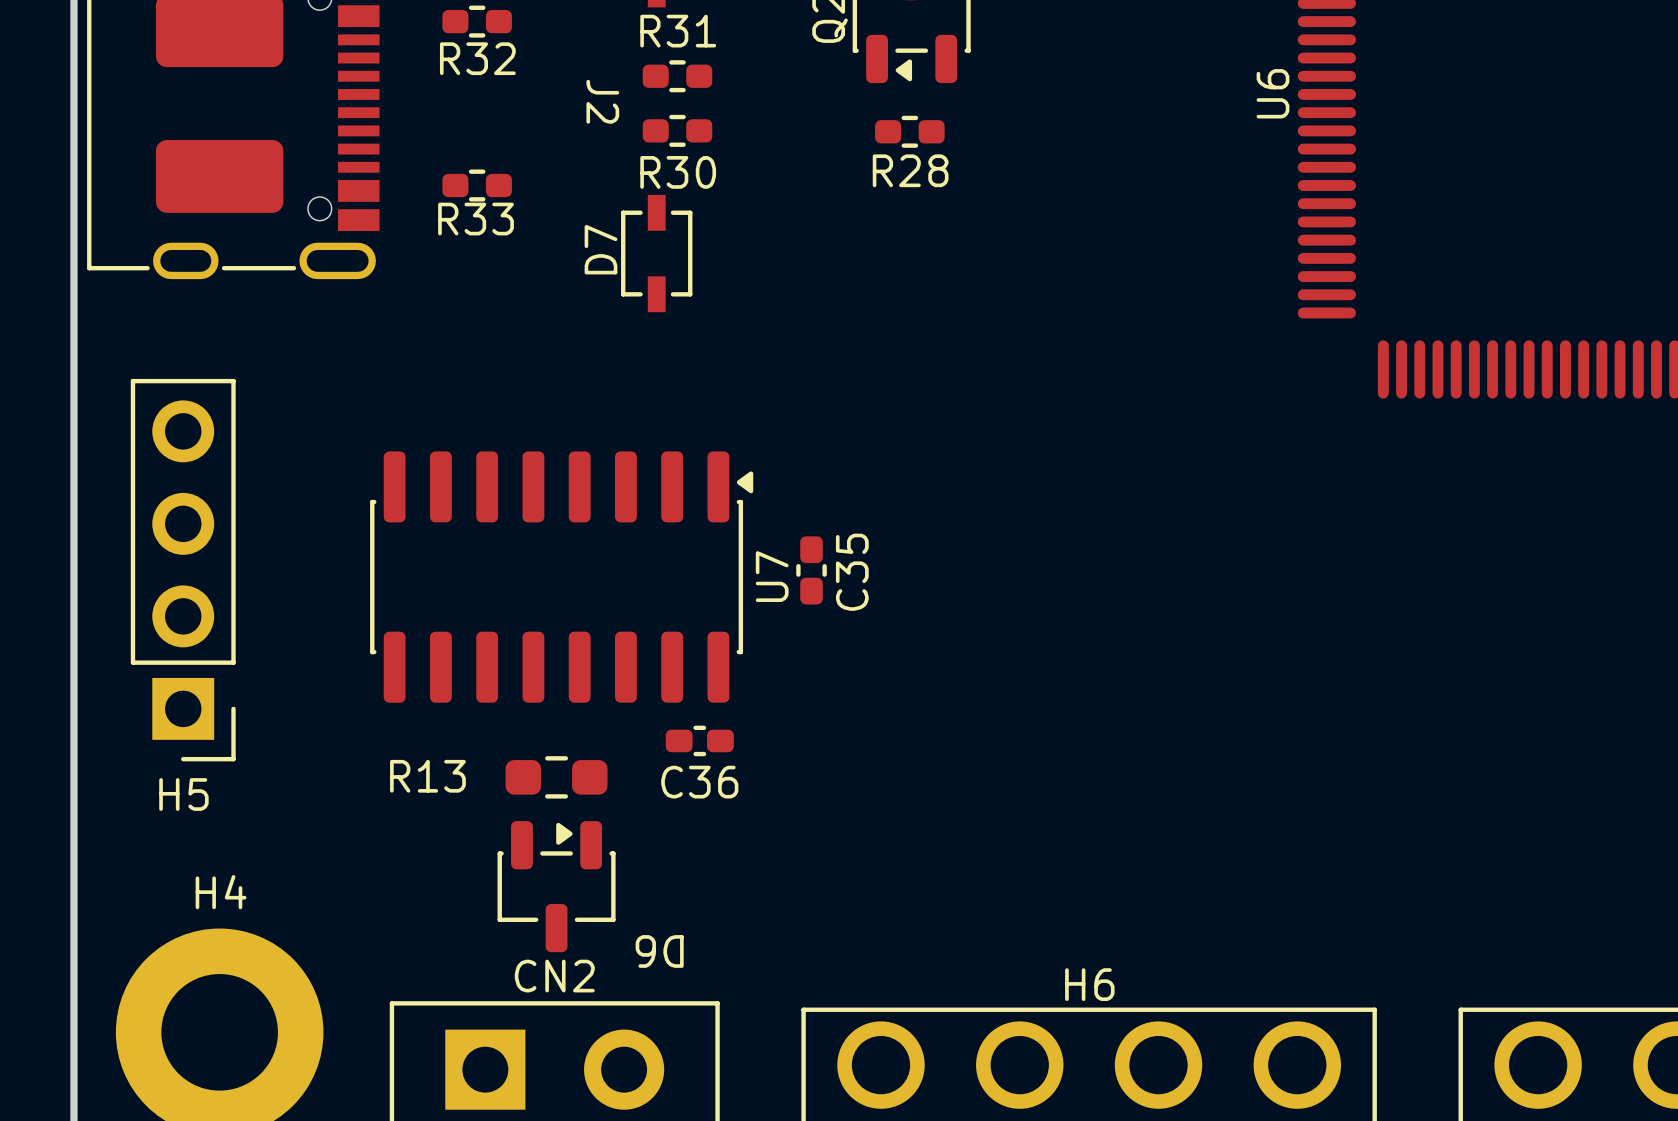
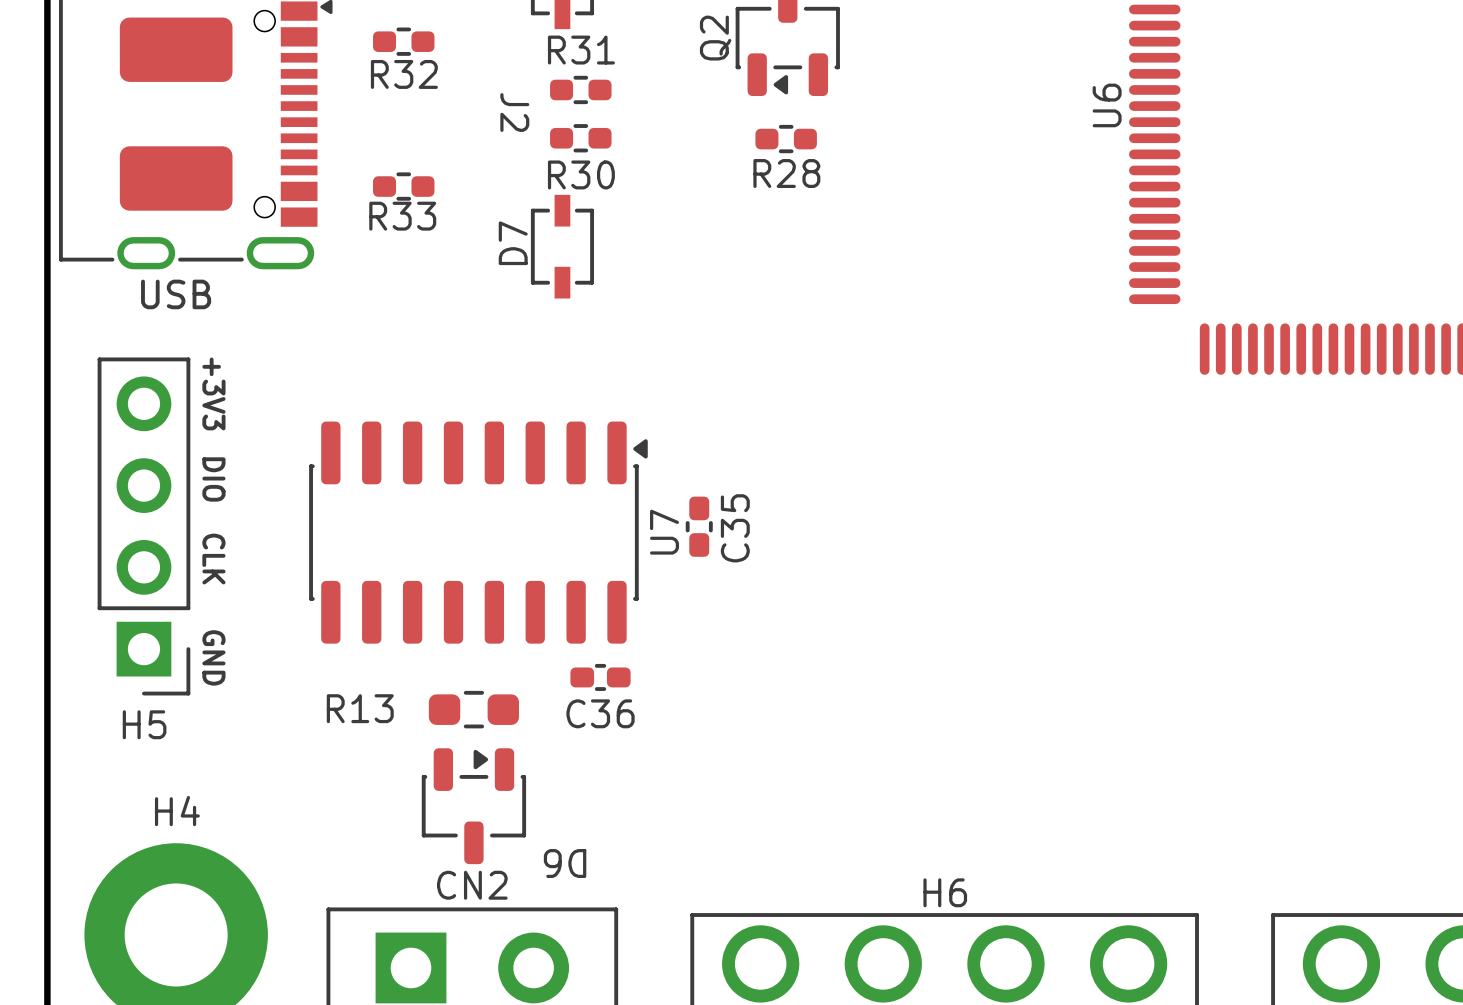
text: none -> USB (176, 294)
text: none -> +3V3 (213, 393)
text: none -> DIO (213, 479)
text: none -> CLK (213, 559)
text: none -> GND (213, 657)

